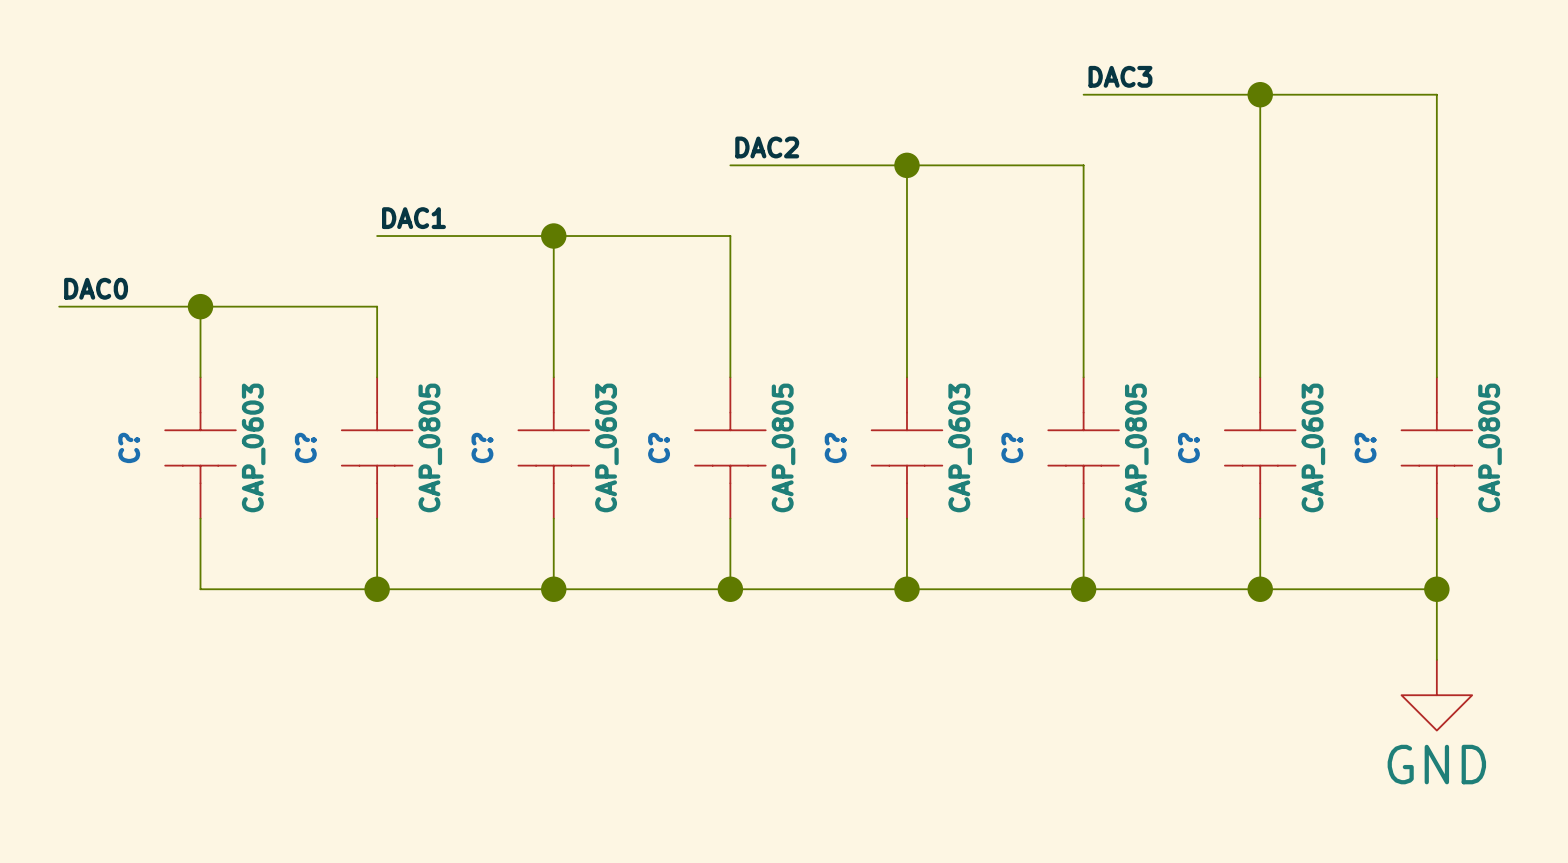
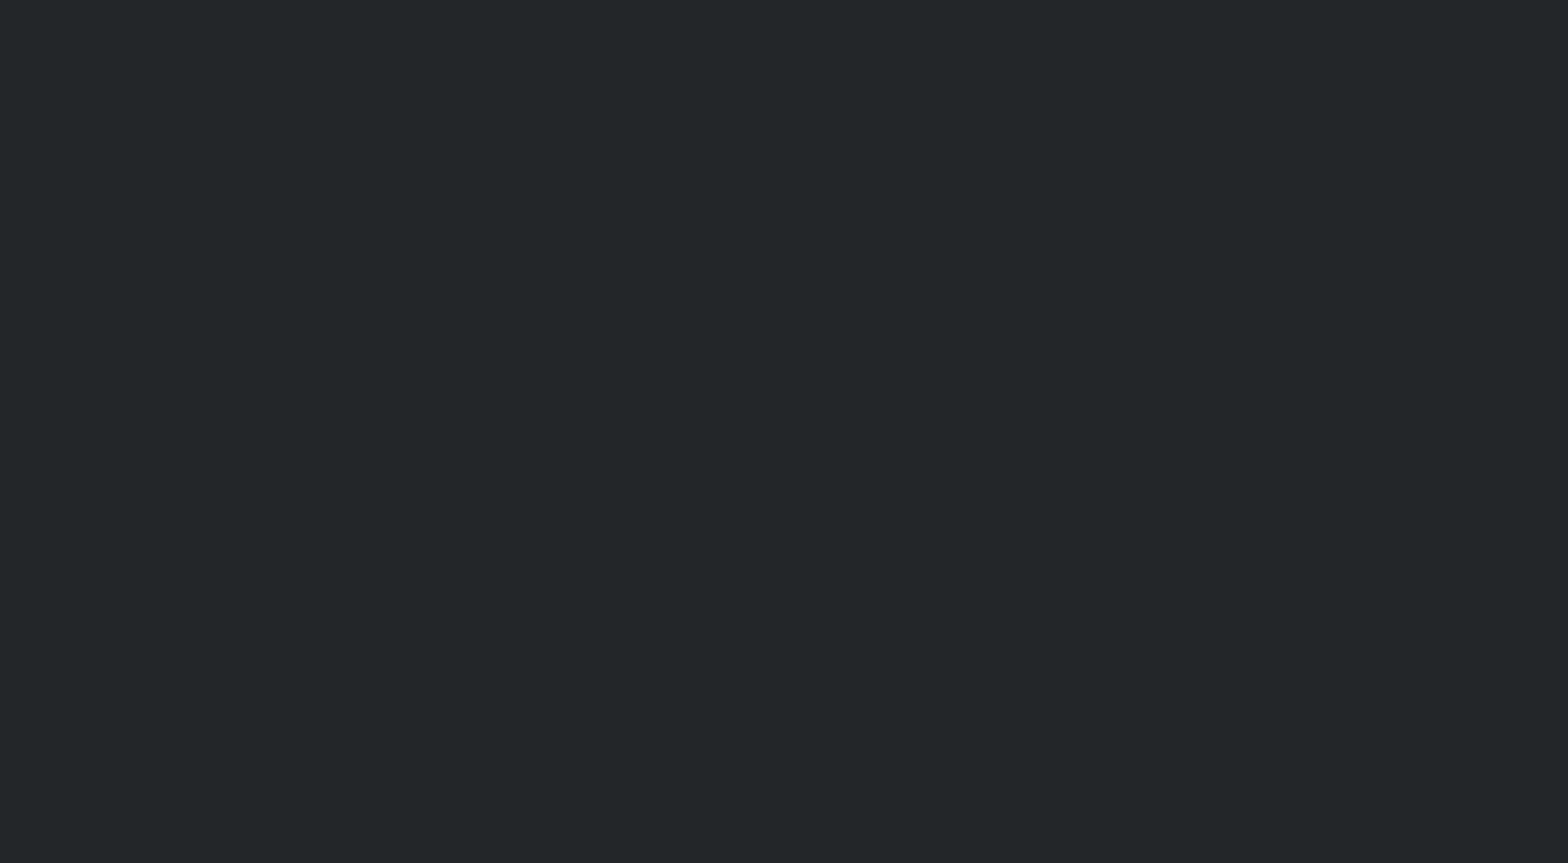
label: DAC3 (1120, 76) -> none
wire: (1083, 94) (1436, 94) (1436, 377) -> none
wire: (1260, 94) (1260, 377) -> none
junction: (1260, 94) -> none
label: DAC2 (767, 147) -> none
wire: (730, 165) (1083, 165) (1083, 377) -> none
wire: (906, 165) (906, 377) -> none
junction: (906, 165) -> none
label: DAC1 (413, 218) -> none
wire: (377, 236) (730, 236) (730, 377) -> none
wire: (553, 236) (553, 377) -> none
junction: (553, 236) -> none
label: DAC0 (96, 288) -> none
wire: (59, 306) (377, 306) (377, 377) -> none
wire: (200, 306) (200, 377) -> none
junction: (200, 306) -> none
C?: CAP_0603 (200, 447) -> none
C?: CAP_0805 (377, 447) -> none
C?: CAP_0603 (553, 447) -> none
C?: CAP_0805 (730, 447) -> none
C?: CAP_0603 (906, 447) -> none
C?: CAP_0805 (1083, 447) -> none
C?: CAP_0603 (1260, 447) -> none
C?: CAP_0805 (1436, 447) -> none
wire: (200, 518) (200, 589) (1436, 589) -> none
wire: (377, 518) (377, 589) -> none
wire: (553, 518) (553, 589) -> none
wire: (730, 518) (730, 589) -> none
wire: (906, 518) (906, 589) -> none
wire: (1083, 518) (1083, 589) -> none
wire: (1260, 518) (1260, 589) -> none
wire: (1436, 518) (1436, 659) -> none
junction: (377, 589) -> none
junction: (553, 589) -> none
junction: (730, 589) -> none
junction: (906, 589) -> none
junction: (1083, 589) -> none
junction: (1260, 589) -> none
junction: (1436, 589) -> none
power symbol: GND (1436, 695) -> none

